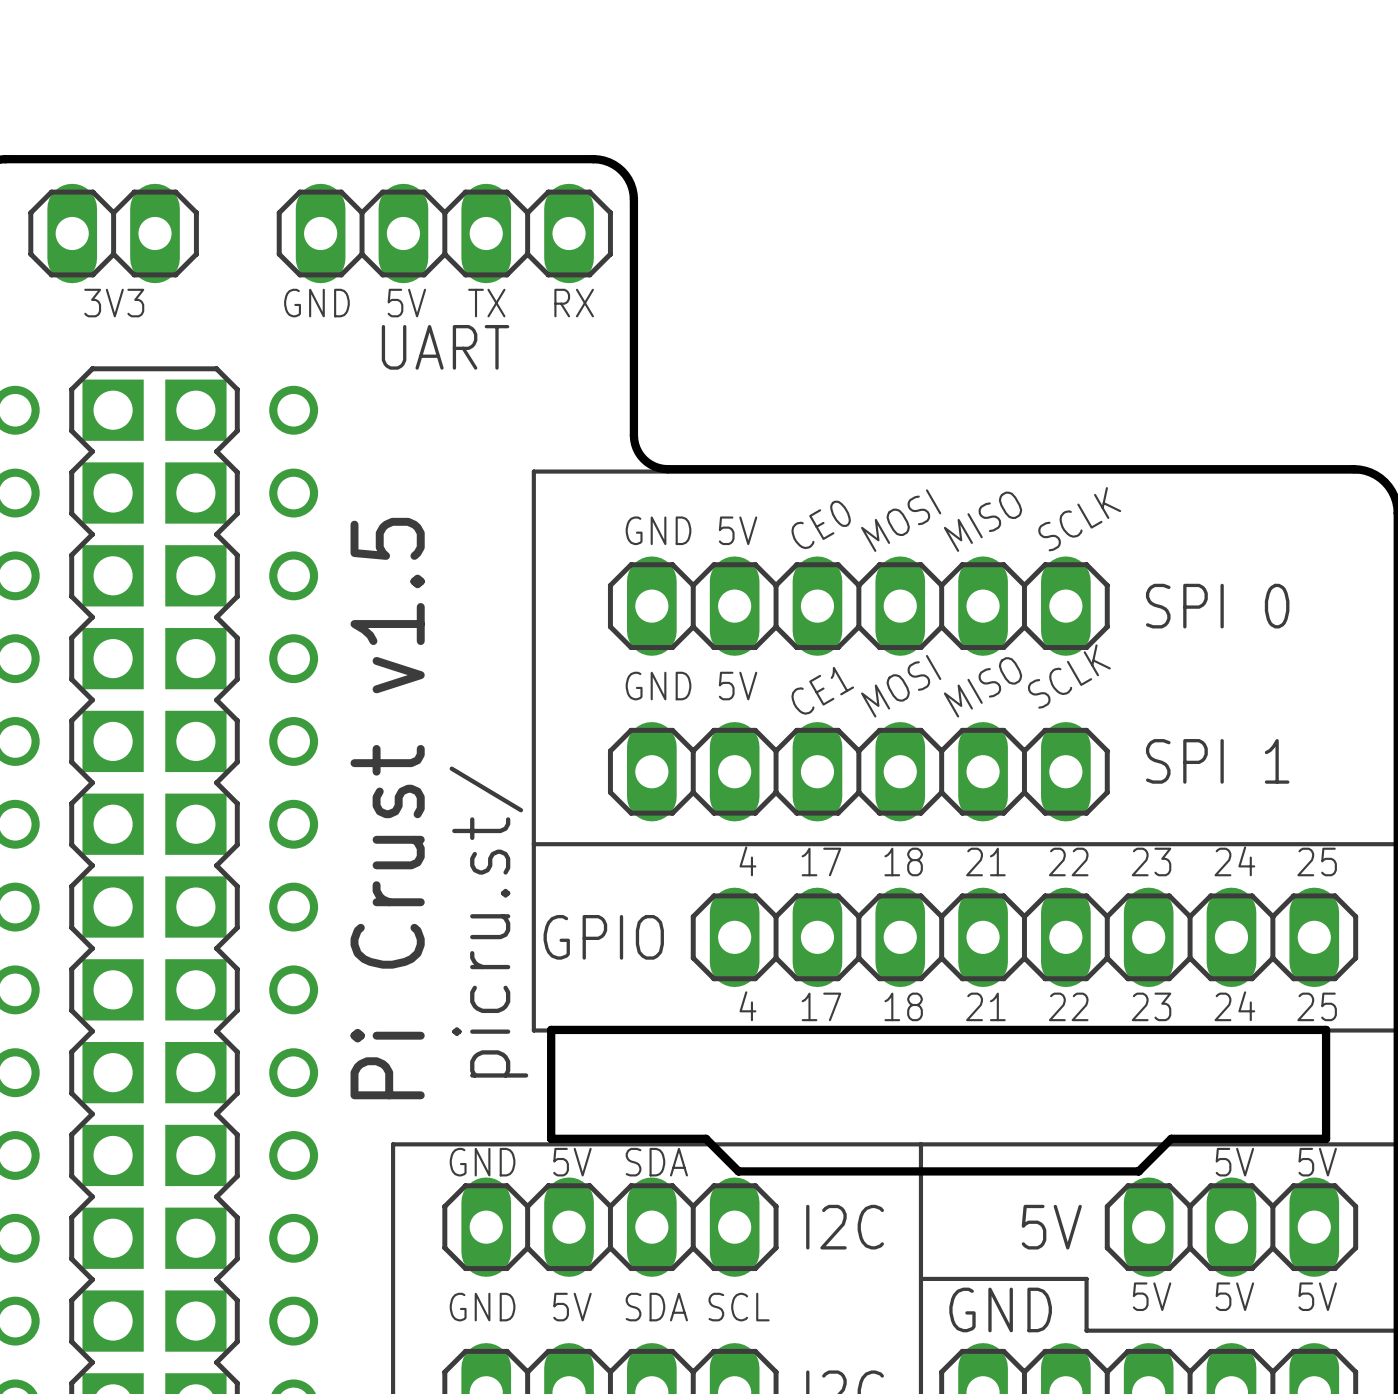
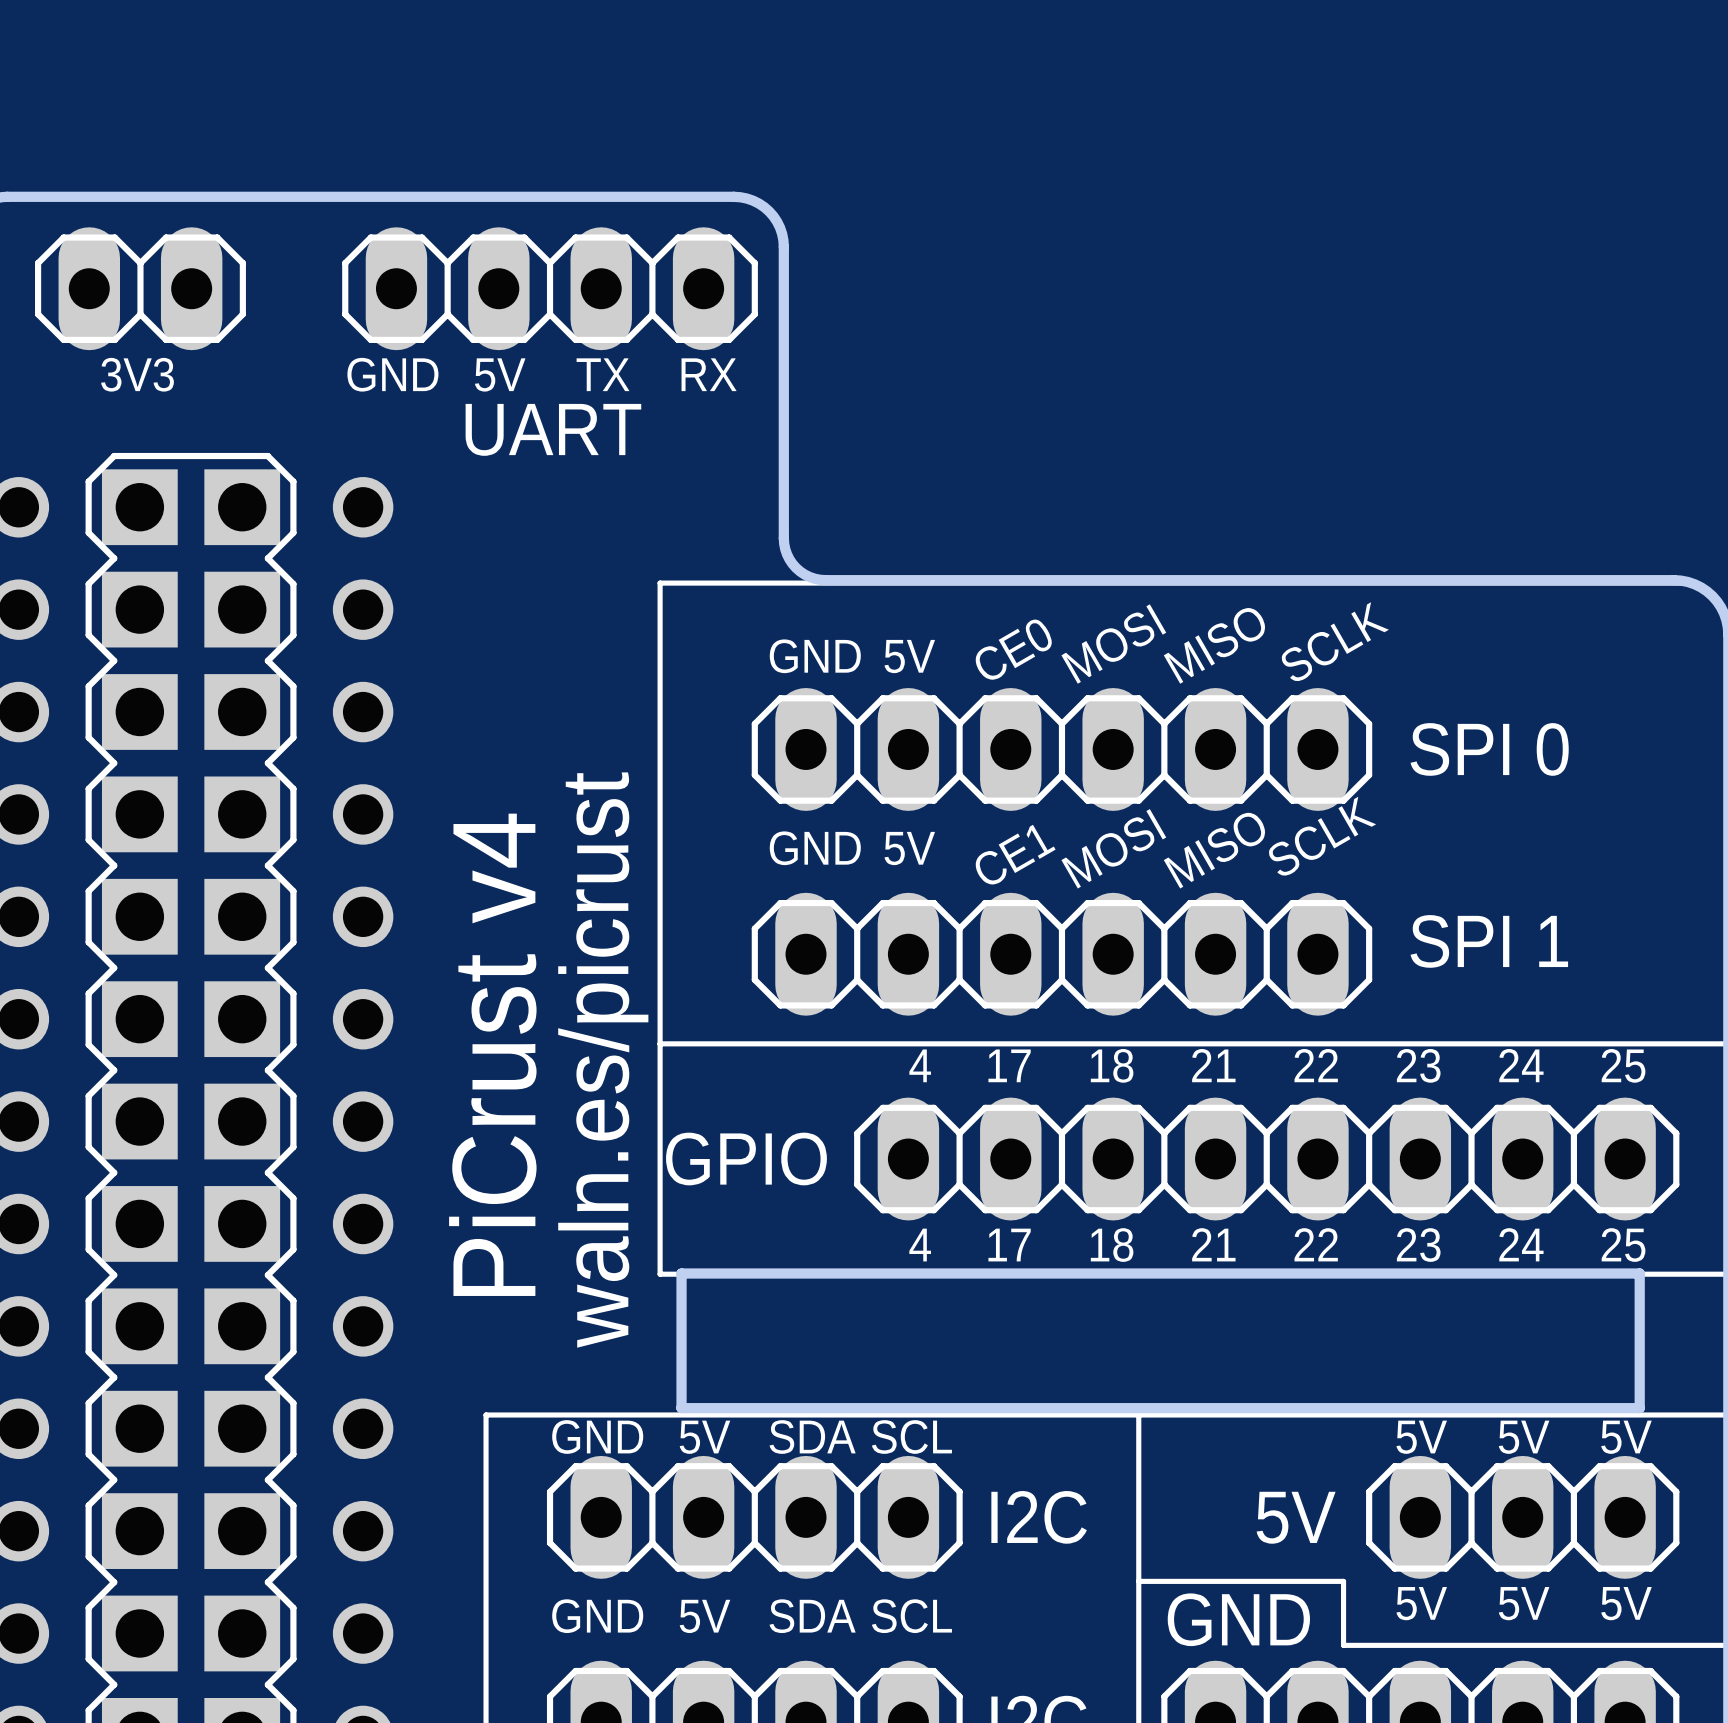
text: Pi Crust v1.5 (387, 808) -> PiCrust v4 (492, 1054)
text: picru.st/ (488, 922) -> waln.es/picrust (603, 1060)
board edge: (705, 1138) (738, 1171) (1138, 1171) (1171, 1138) -> (872, 1408) (1448, 1408)
text: none -> SCL (911, 1437)
text: none -> 5V (1421, 1437)

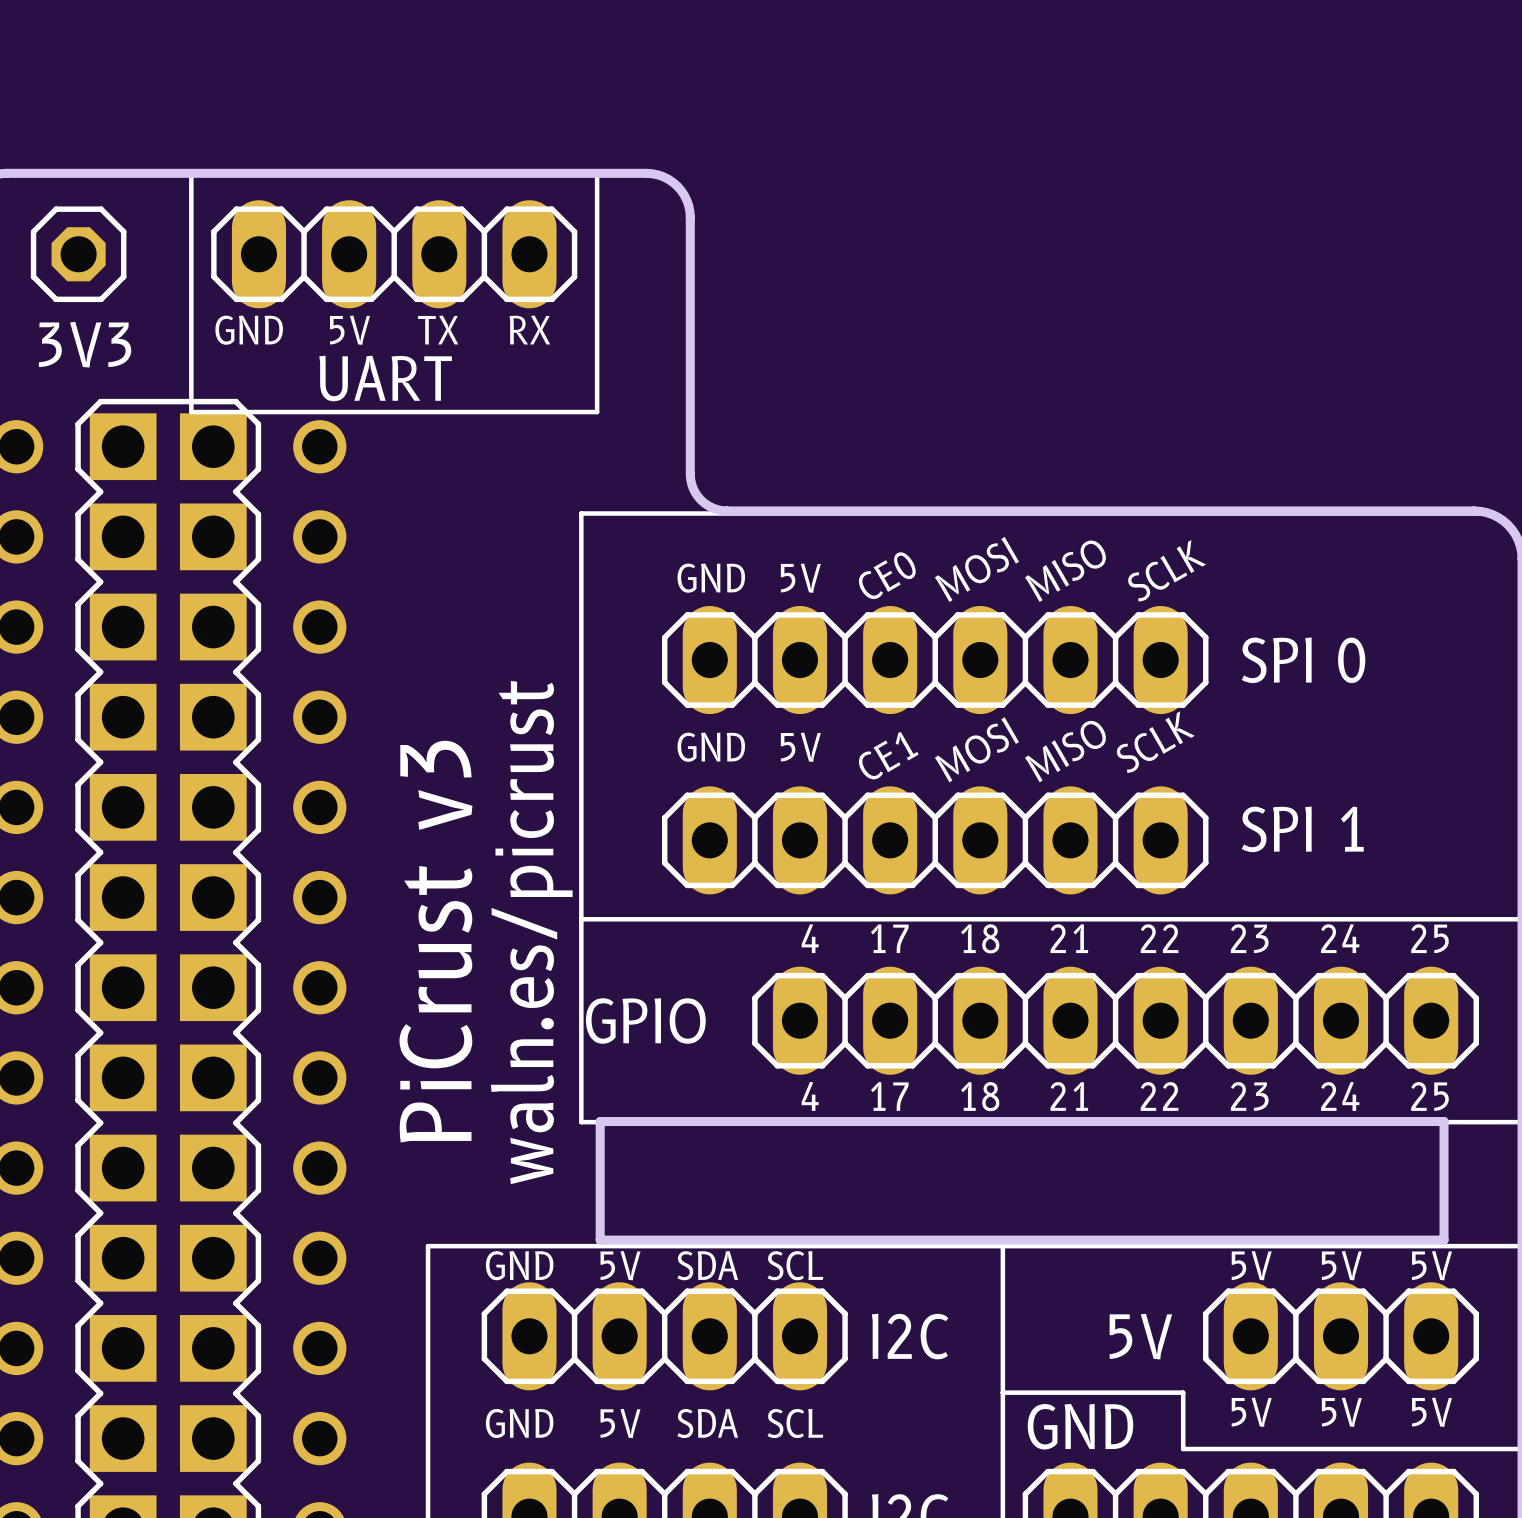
line: none -> (191, 175) (191, 412) (597, 412) (597, 175)
part: none -> 3V3 (78, 254)
part: (140, 288) -> none
part position: (550, 288) -> (394, 254)
text: 3V3 (137, 374) -> none
text: none -> GND (249, 330)
text: GND (392, 374) -> 5V (350, 330)
text: 5V (500, 374) -> TX (438, 330)
text: TX (603, 374) -> RX (529, 330)
text: RX (709, 374) -> none
text: PiCrust v4 (492, 1054) -> PiCrust v3 (435, 941)

